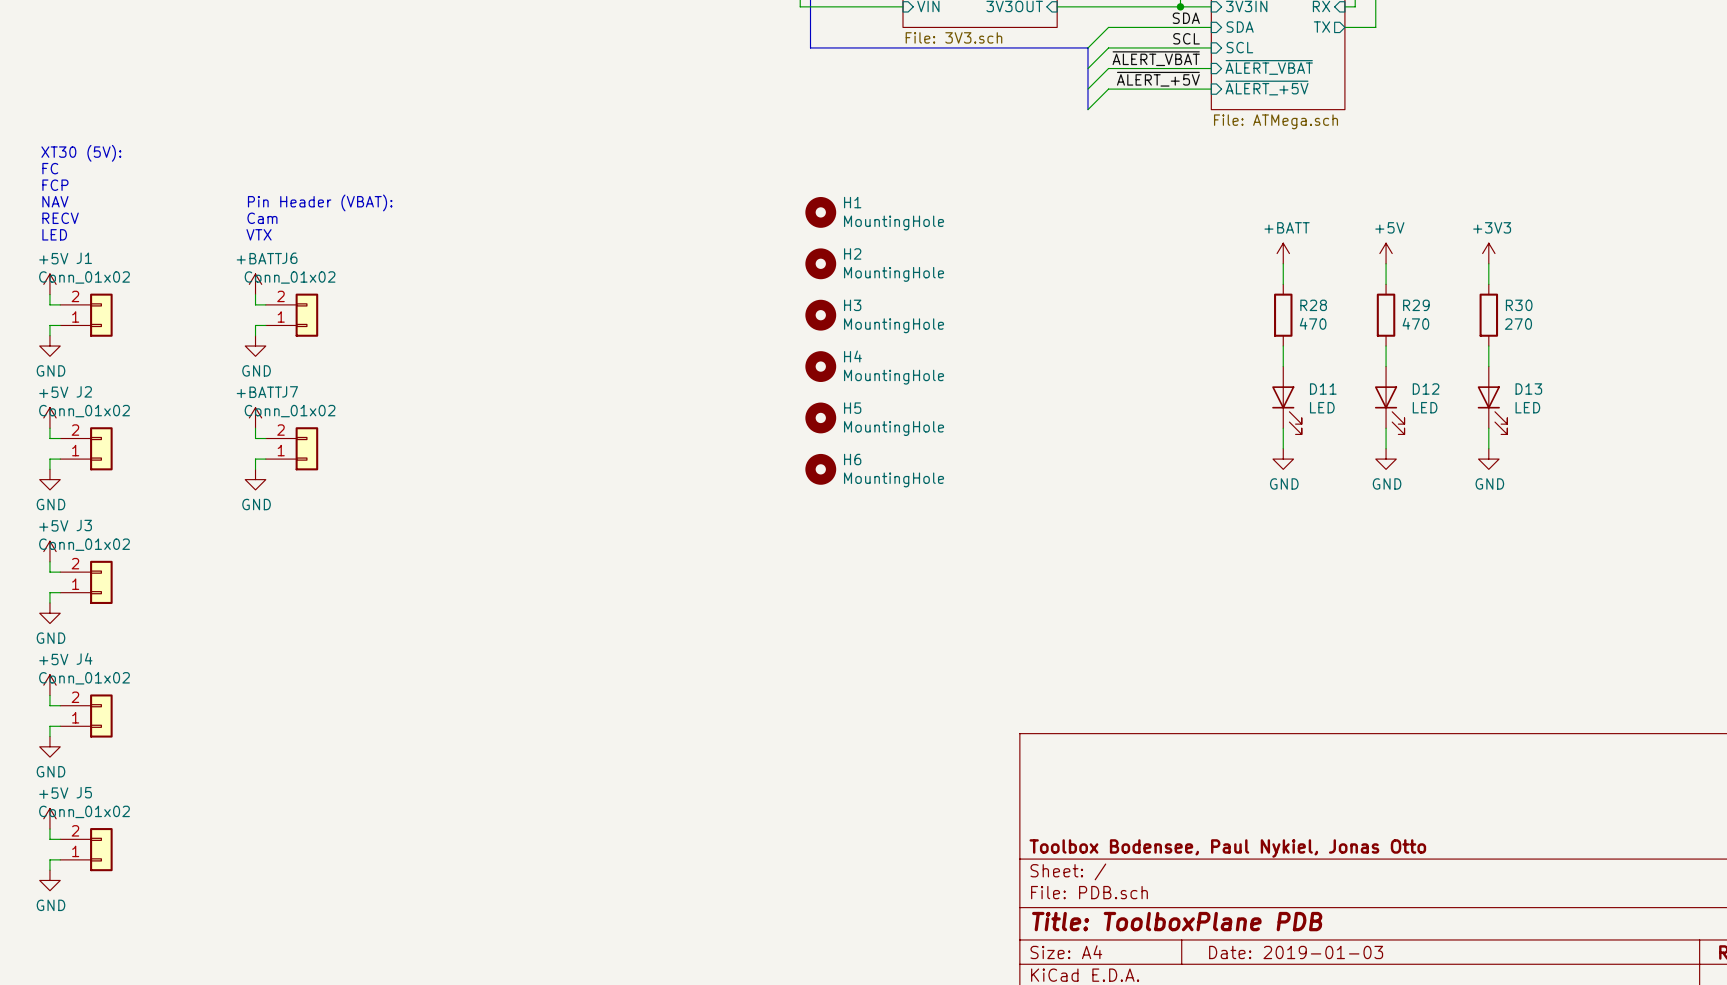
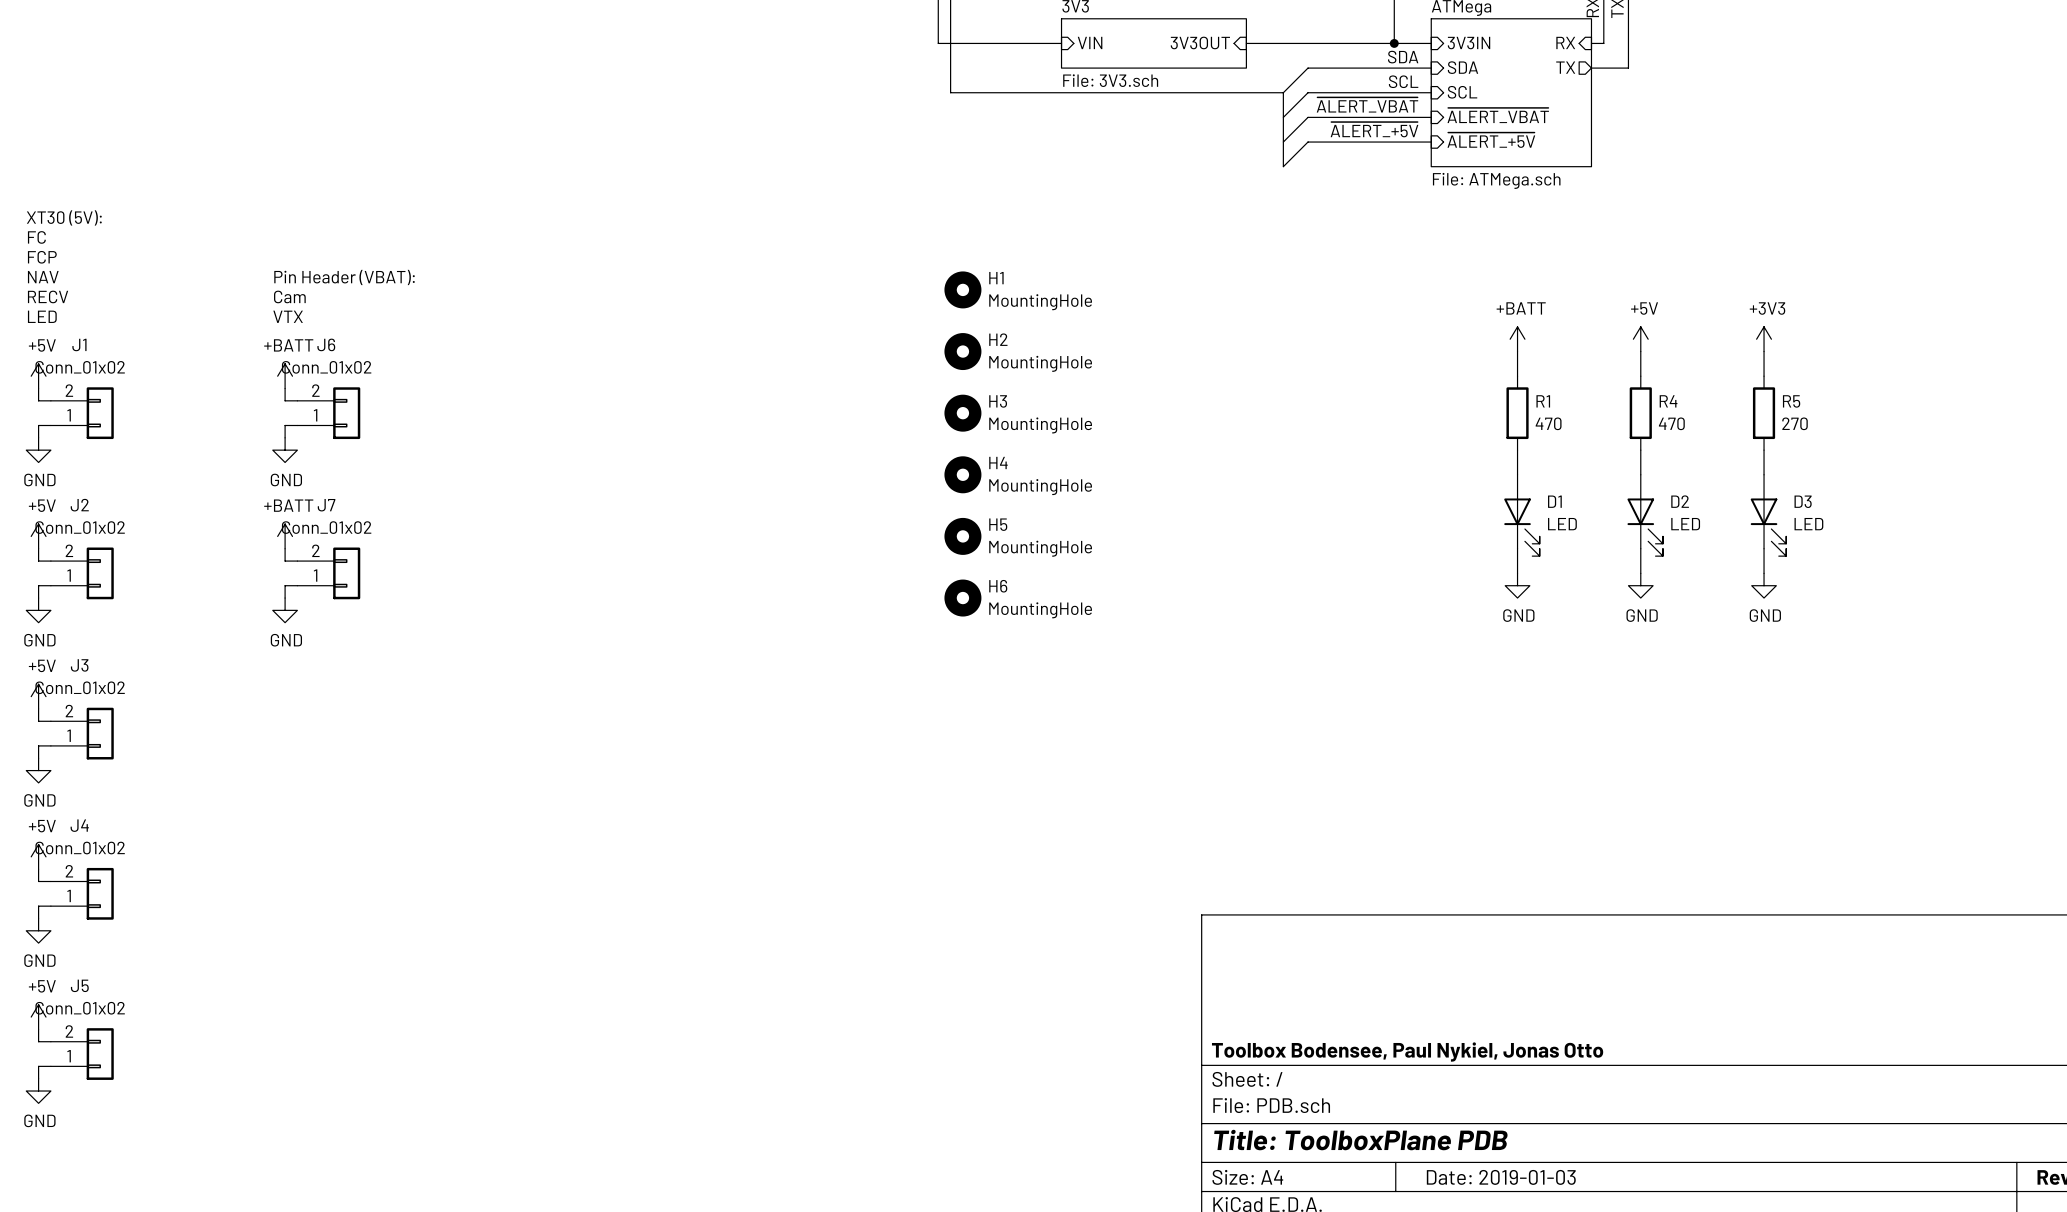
R28 name: R28 (1313, 305) -> R1 (1543, 401)
R29 name: R29 (1416, 305) -> R4 (1668, 401)
R30 name: R30 (1519, 305) -> R5 (1791, 401)
D11 name: D11 (1323, 389) -> D1 (1554, 501)
D12 name: D12 (1426, 389) -> D2 (1680, 501)
D13 name: D13 (1528, 389) -> D3 (1803, 501)

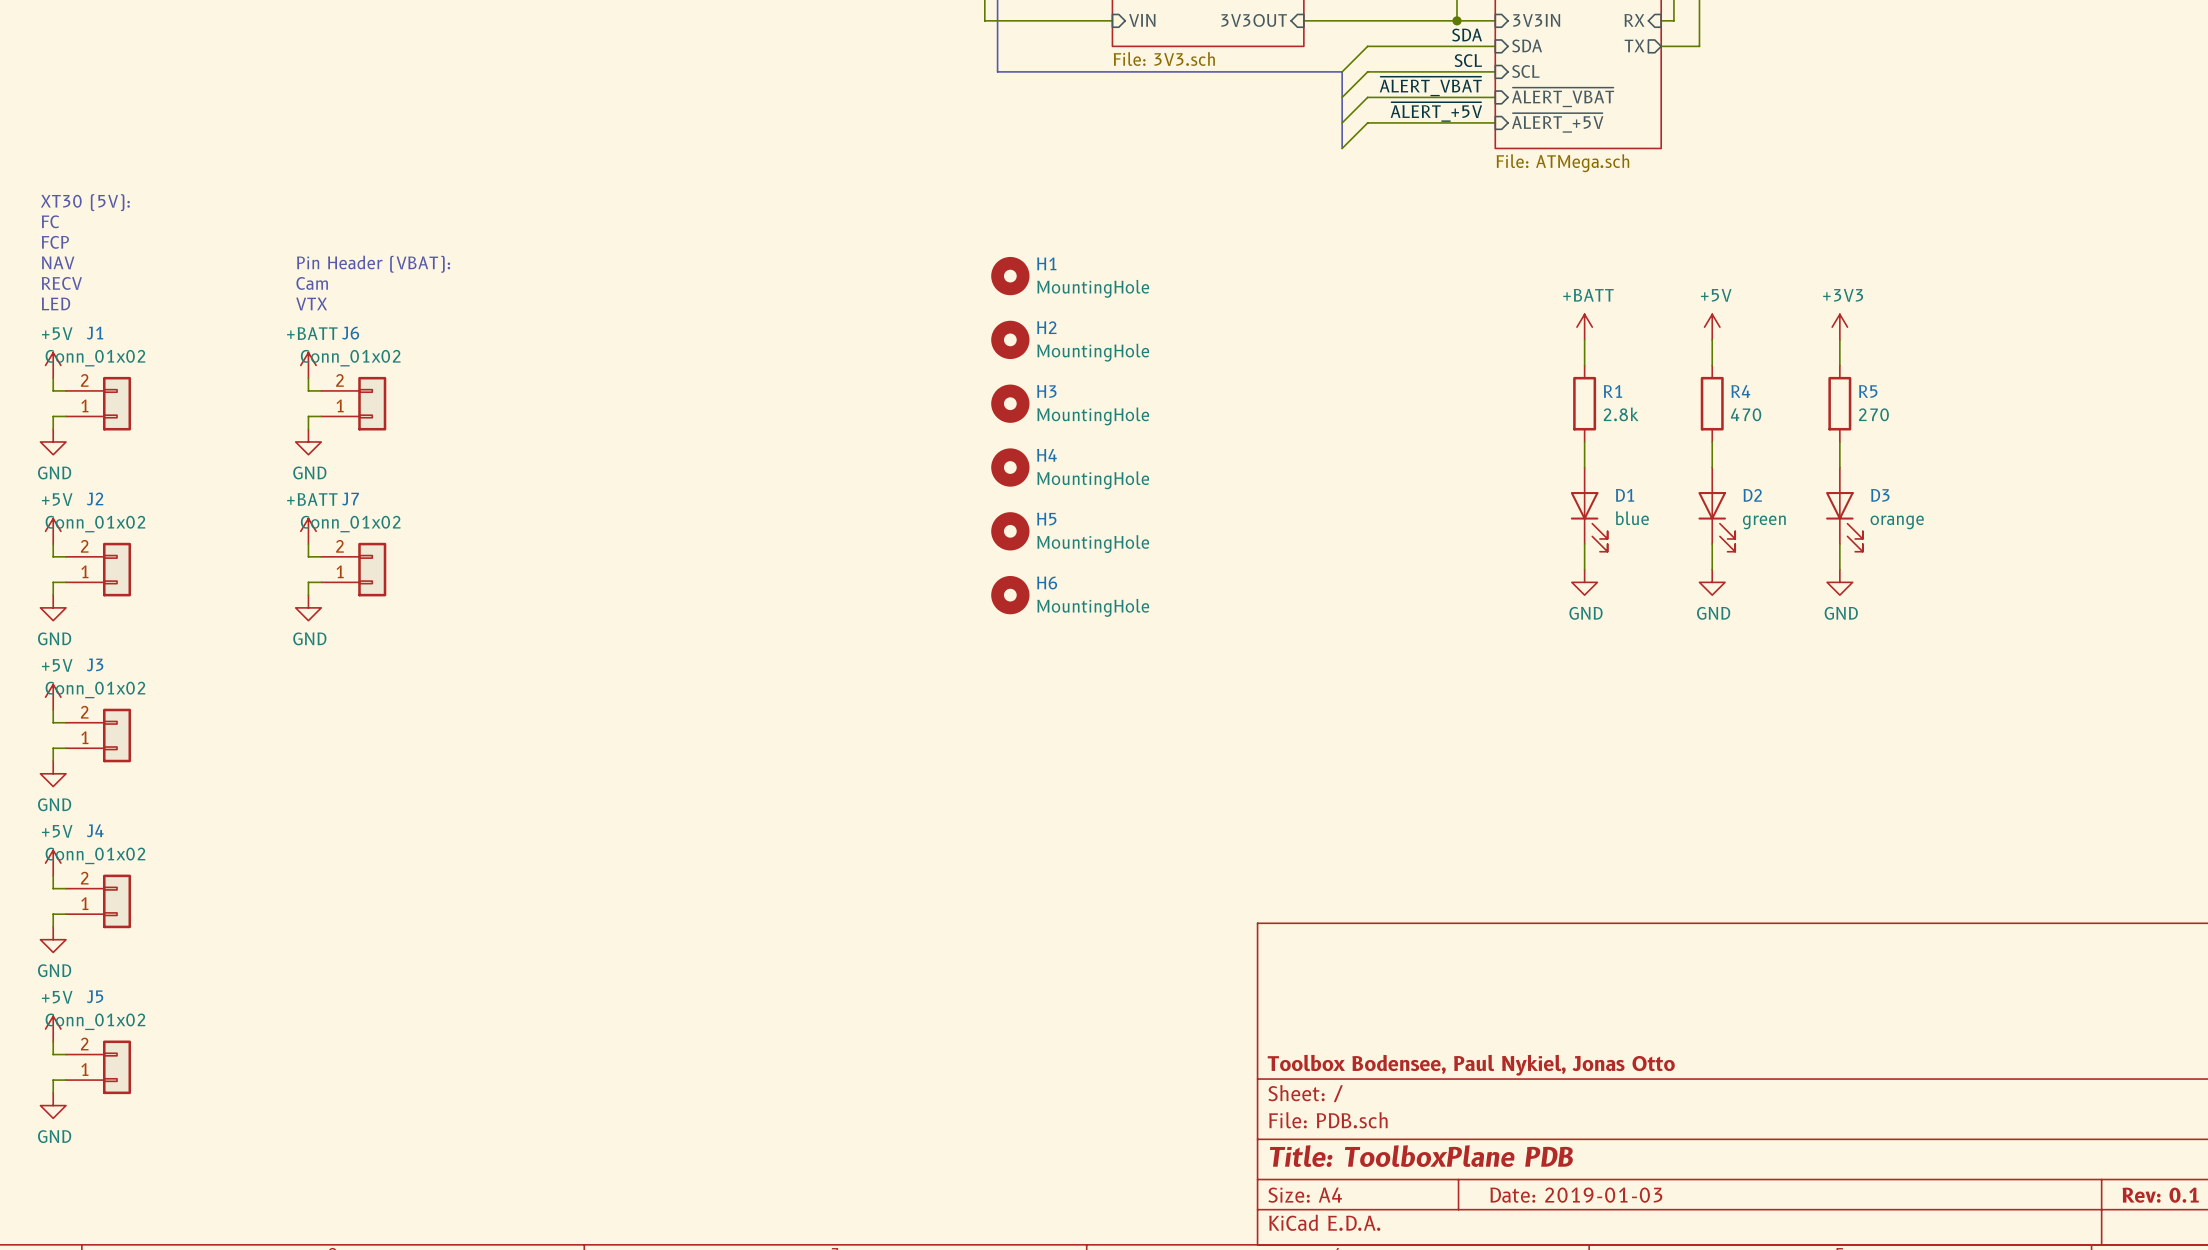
R1 value: 470 (1548, 423) -> 2.8k (1621, 414)
D1 value: LED (1562, 524) -> blue (1632, 518)
D2 value: LED (1685, 524) -> green (1764, 522)
D3 value: LED (1808, 524) -> orange (1897, 522)

